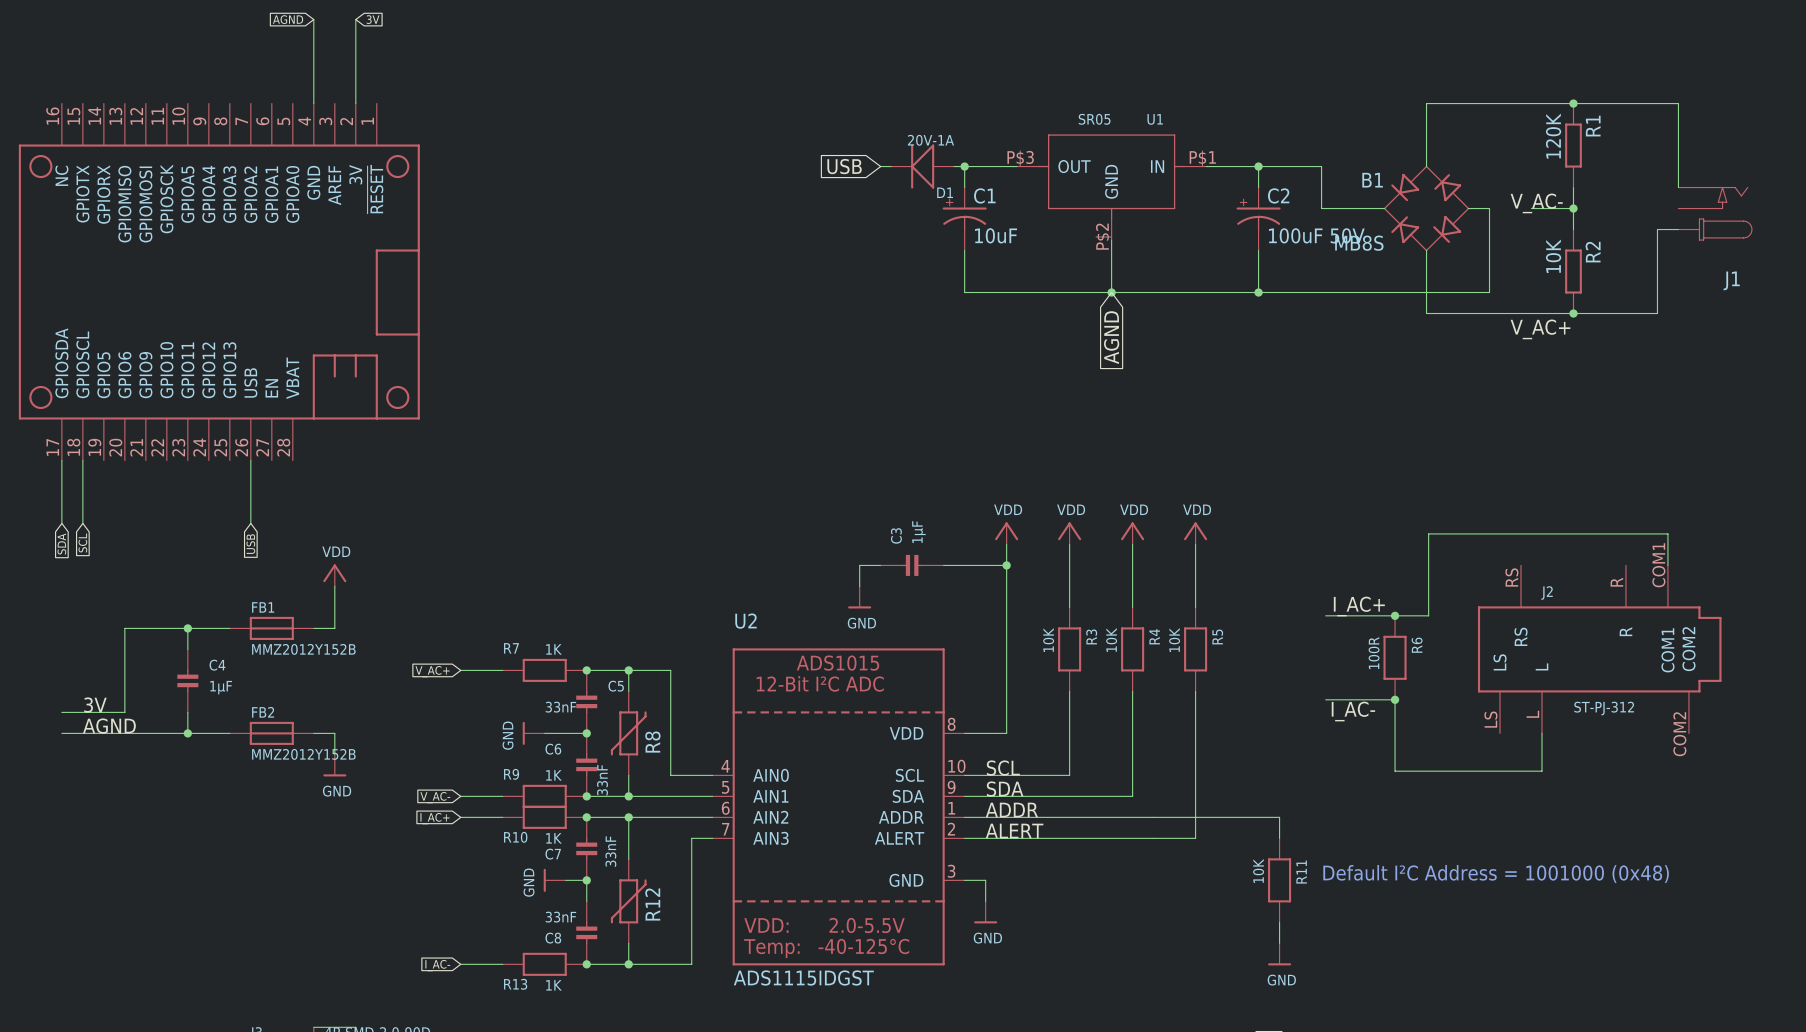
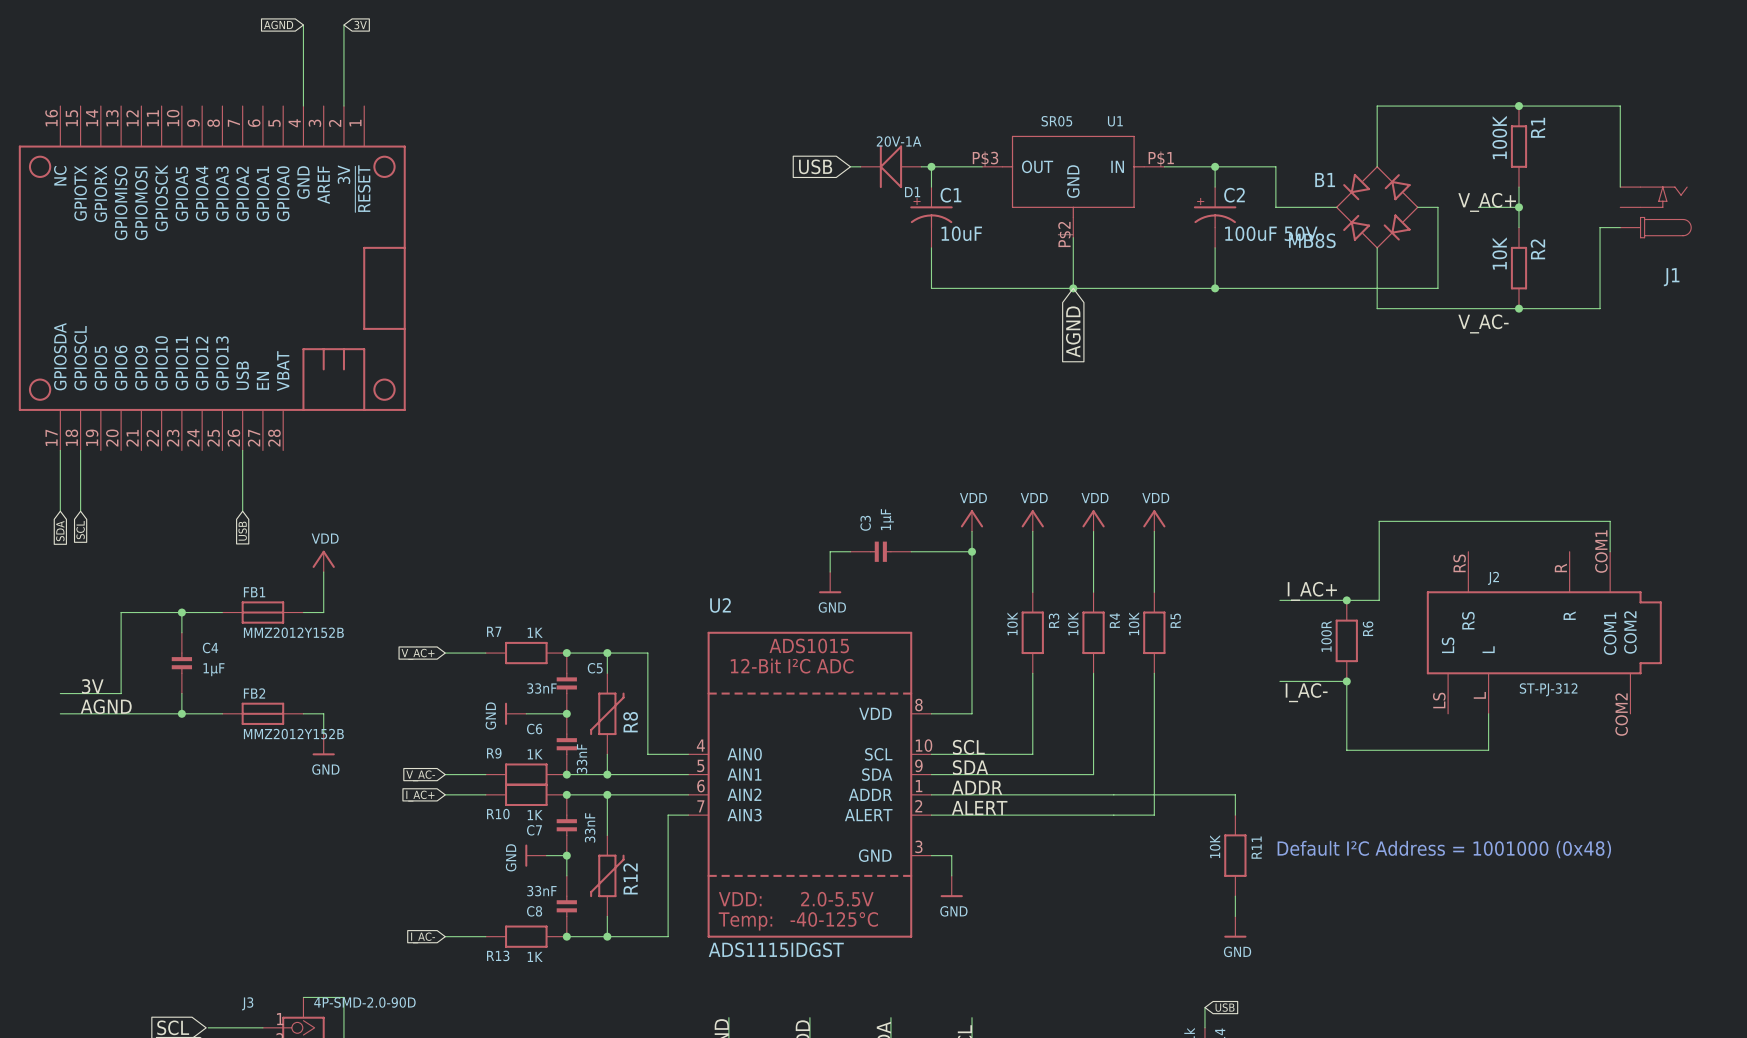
R1 value: 120K (1553, 136) -> 100K (1499, 137)
label: V_AC- (1536, 203) -> V_AC+ (1487, 202)
label: V_AC+ (1540, 329) -> V_AC- (1483, 323)

